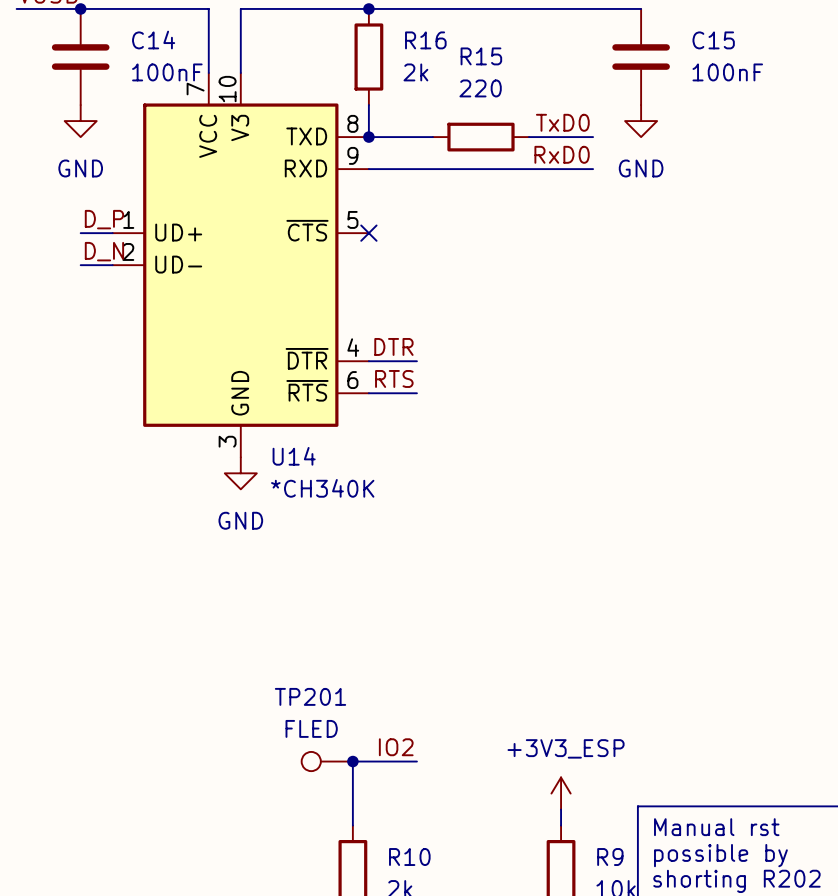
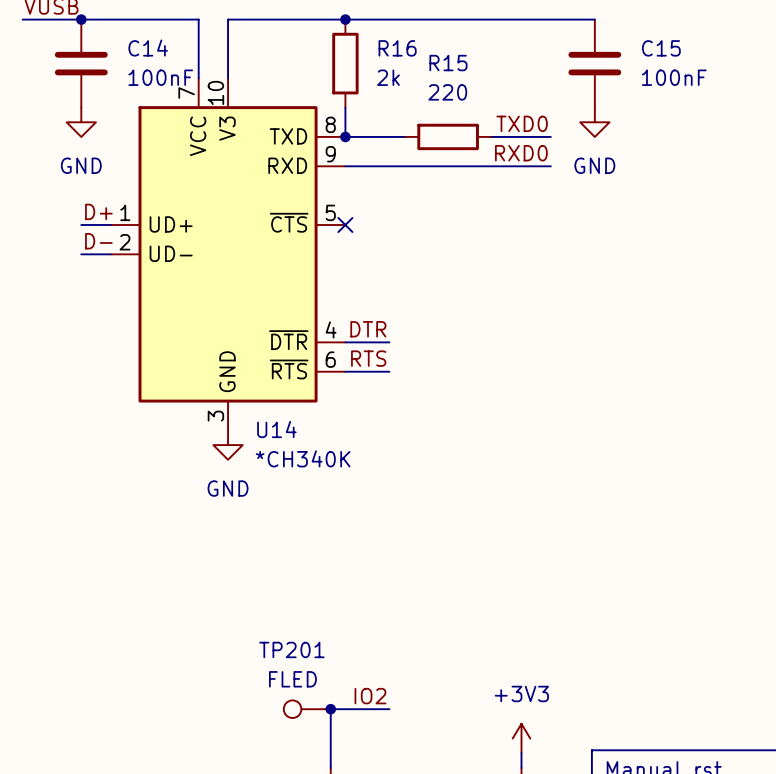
label: TxD0 (562, 122) -> TXD0 (522, 123)
label: RxD0 (562, 154) -> RXD0 (521, 153)
label: D_P (104, 219) -> D+ (98, 211)
label: D_N (104, 251) -> D- (98, 241)
power symbol: +3V3_ESP (561, 793) -> +3V3 (521, 738)

